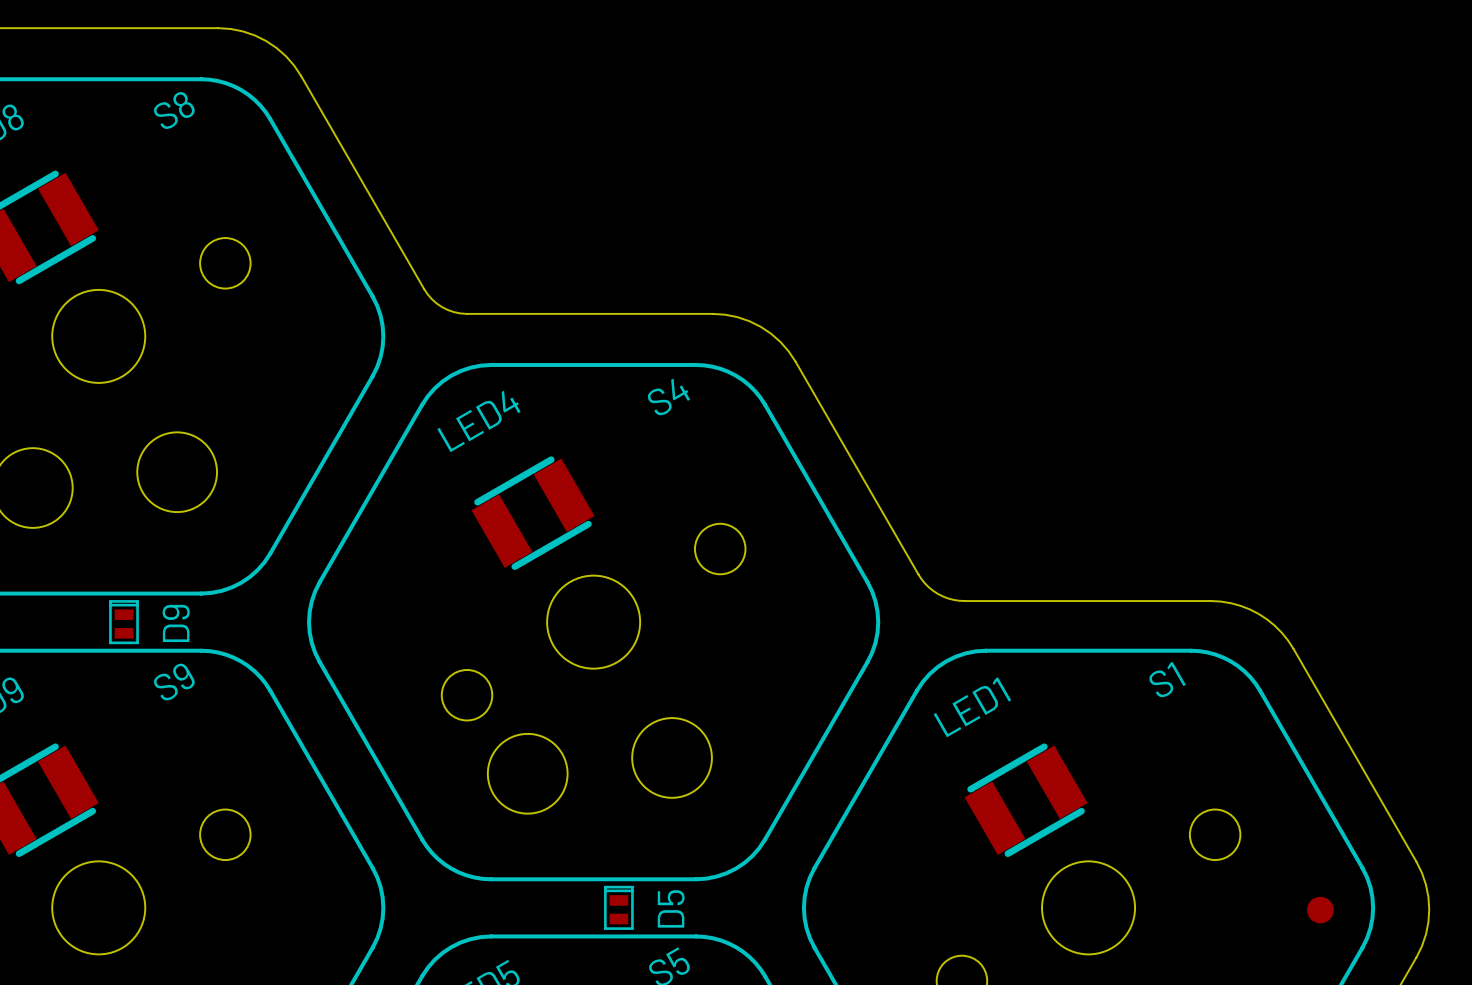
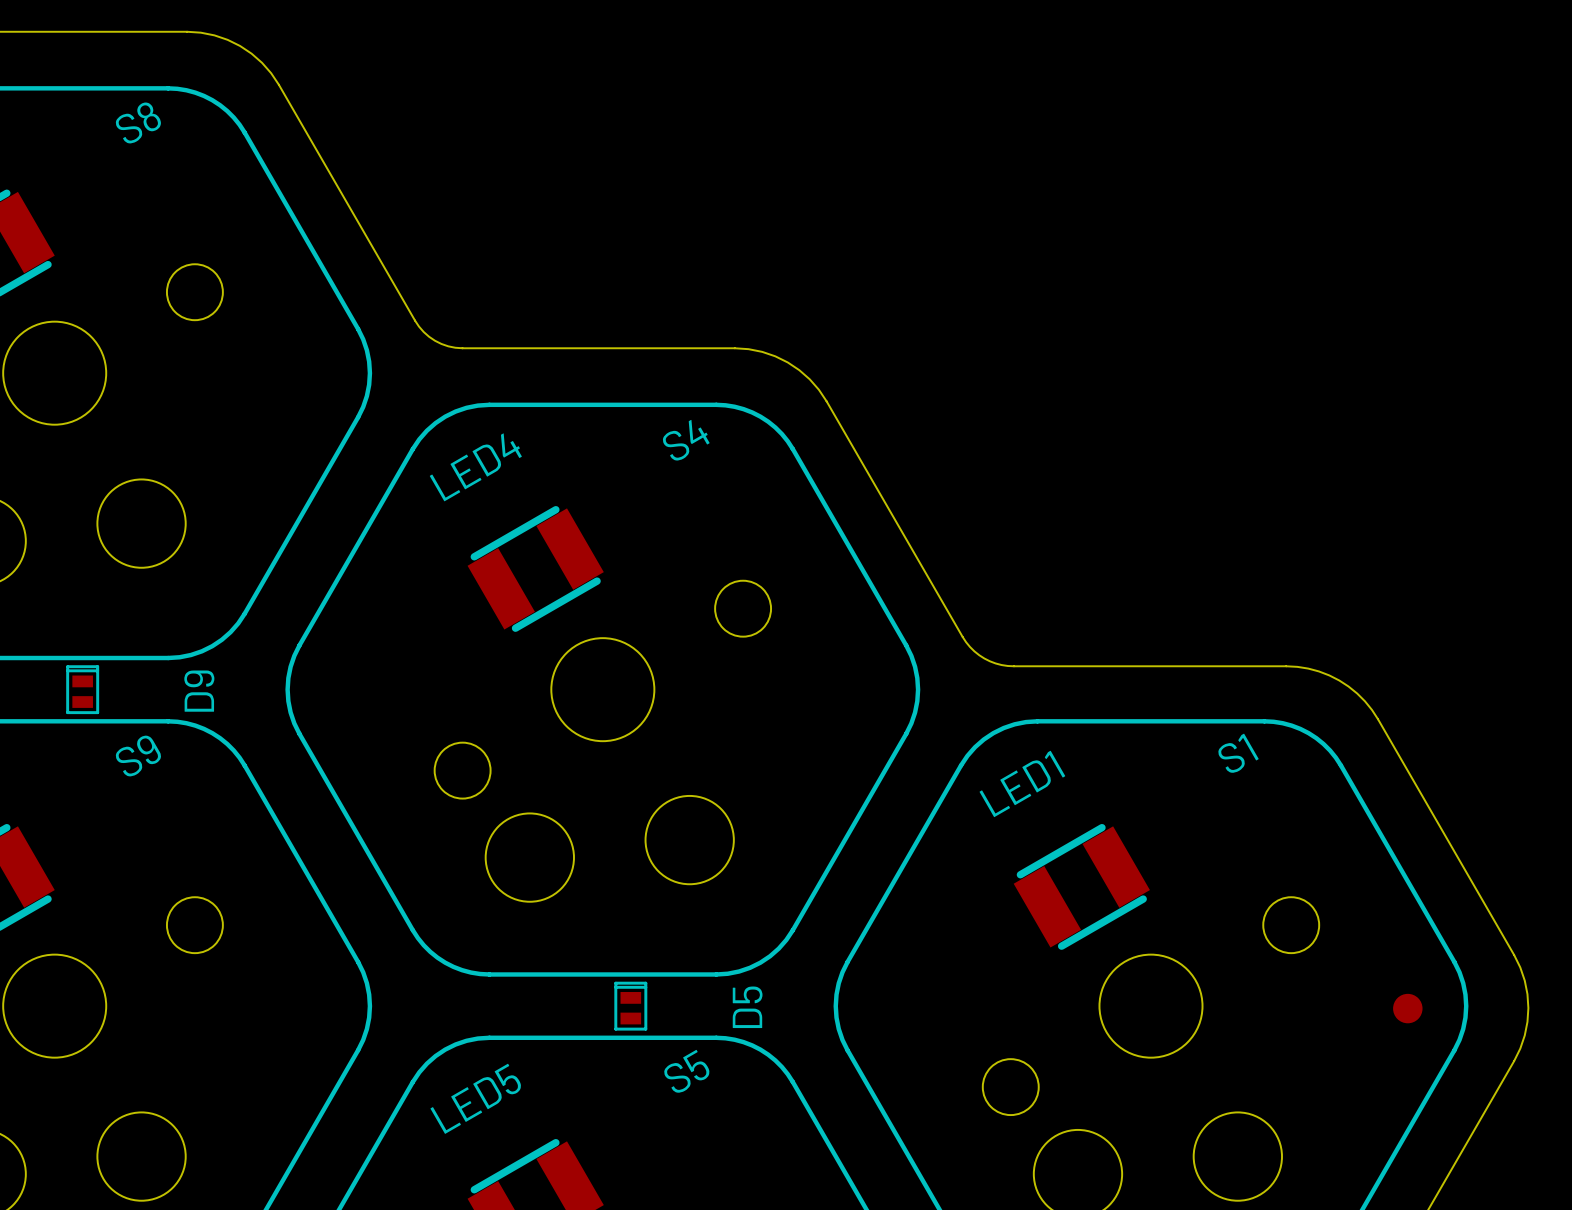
D9 name position: D9 (176, 623) -> D9 (199, 691)
D5 name position: D5 (671, 908) -> D5 (747, 1007)

